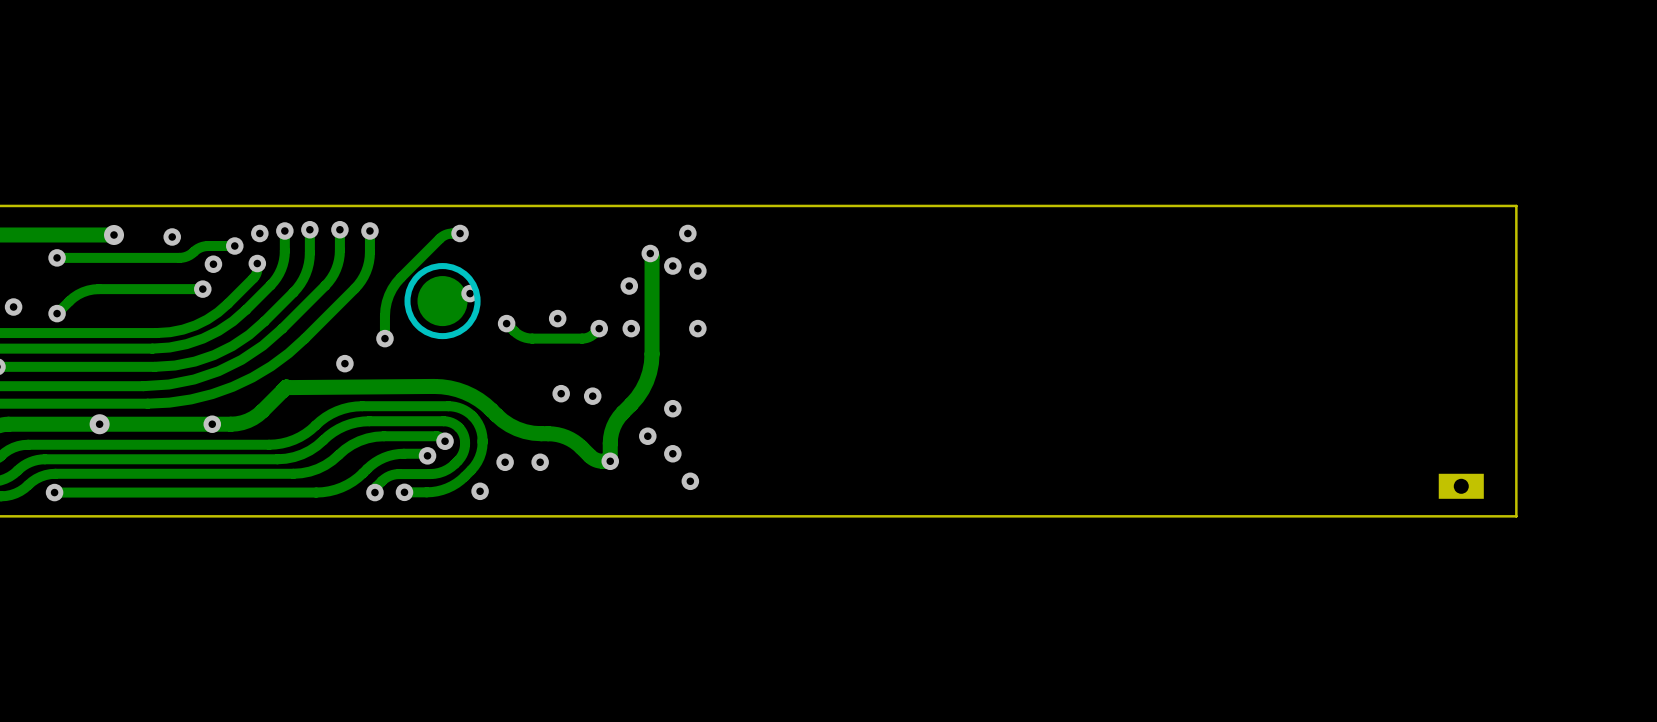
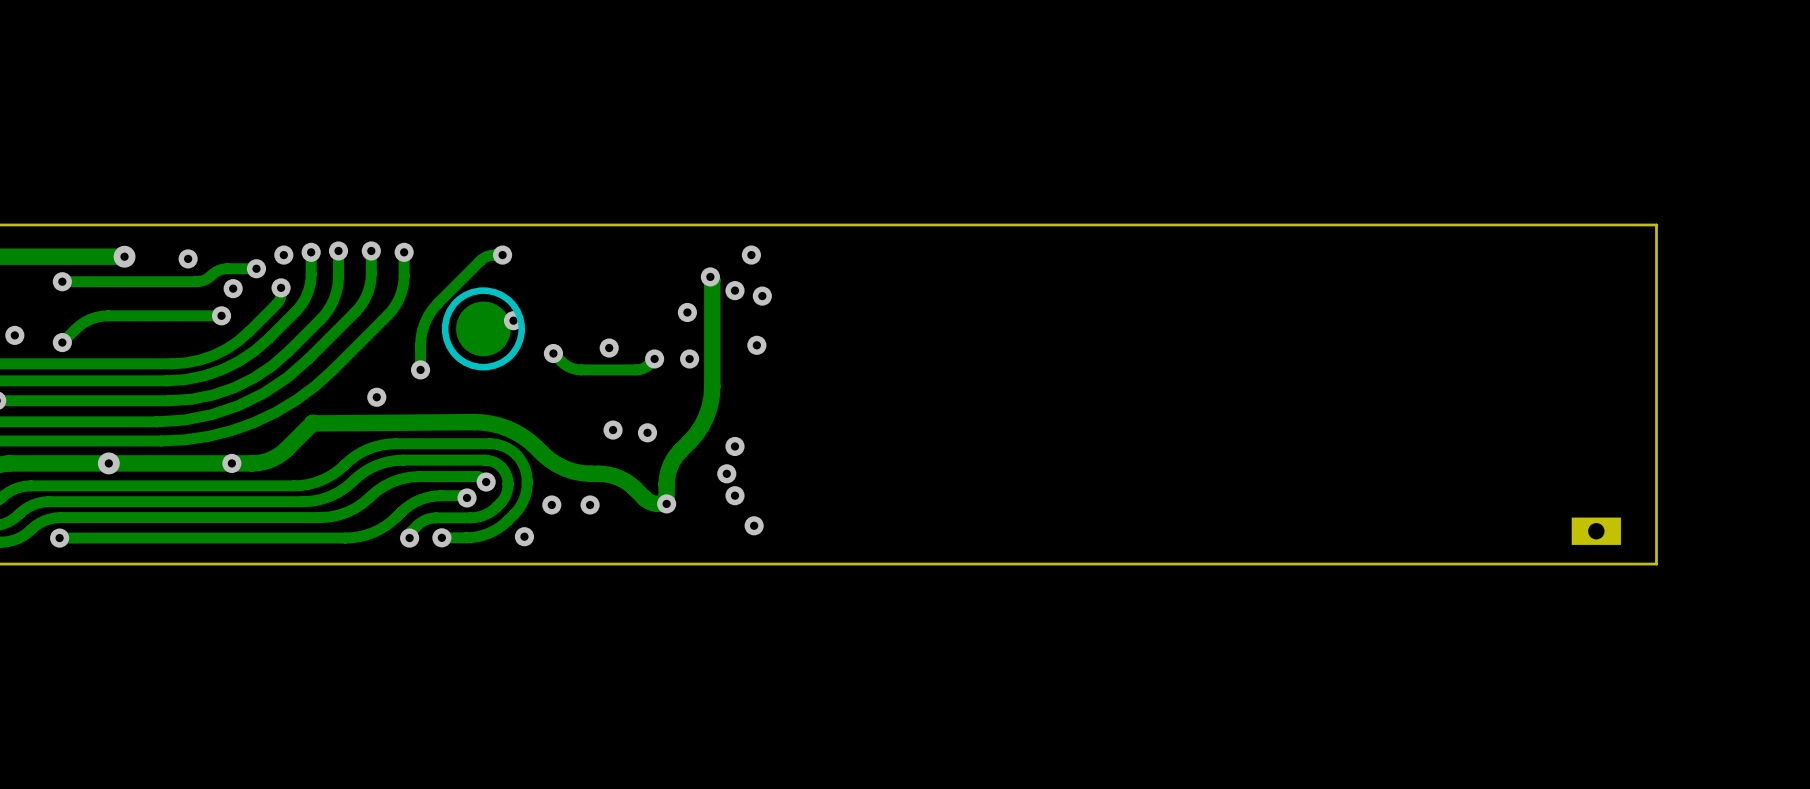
via position: (697, 328) -> (756, 345)
via position: (647, 436) -> (726, 473)

